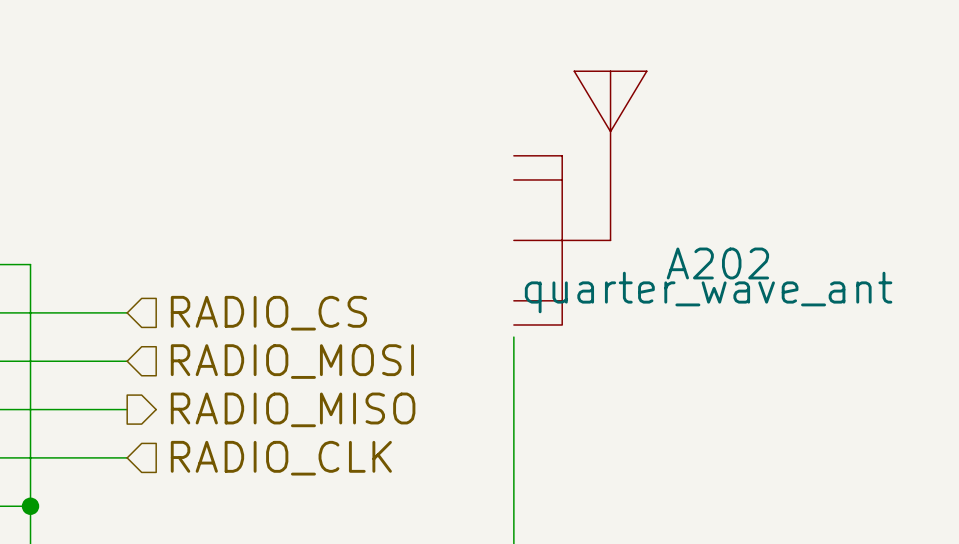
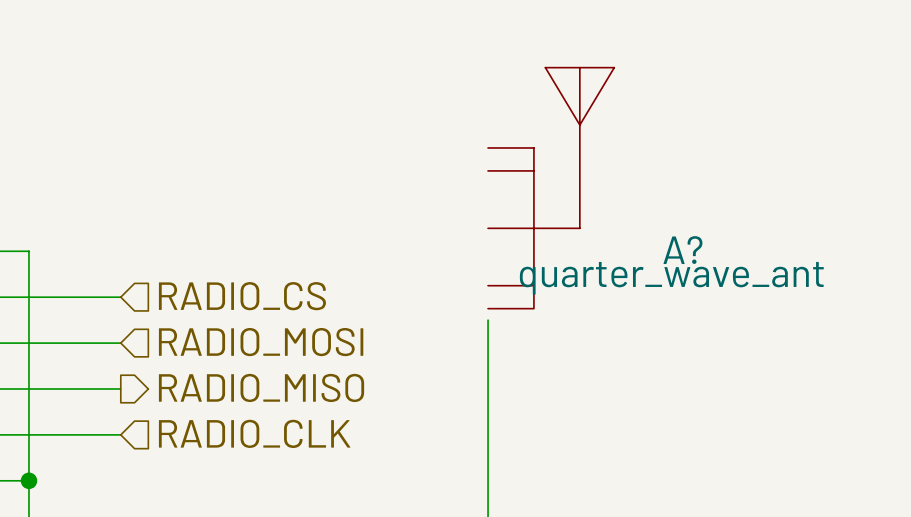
A202 name: A202 (717, 263) -> A? (682, 250)

